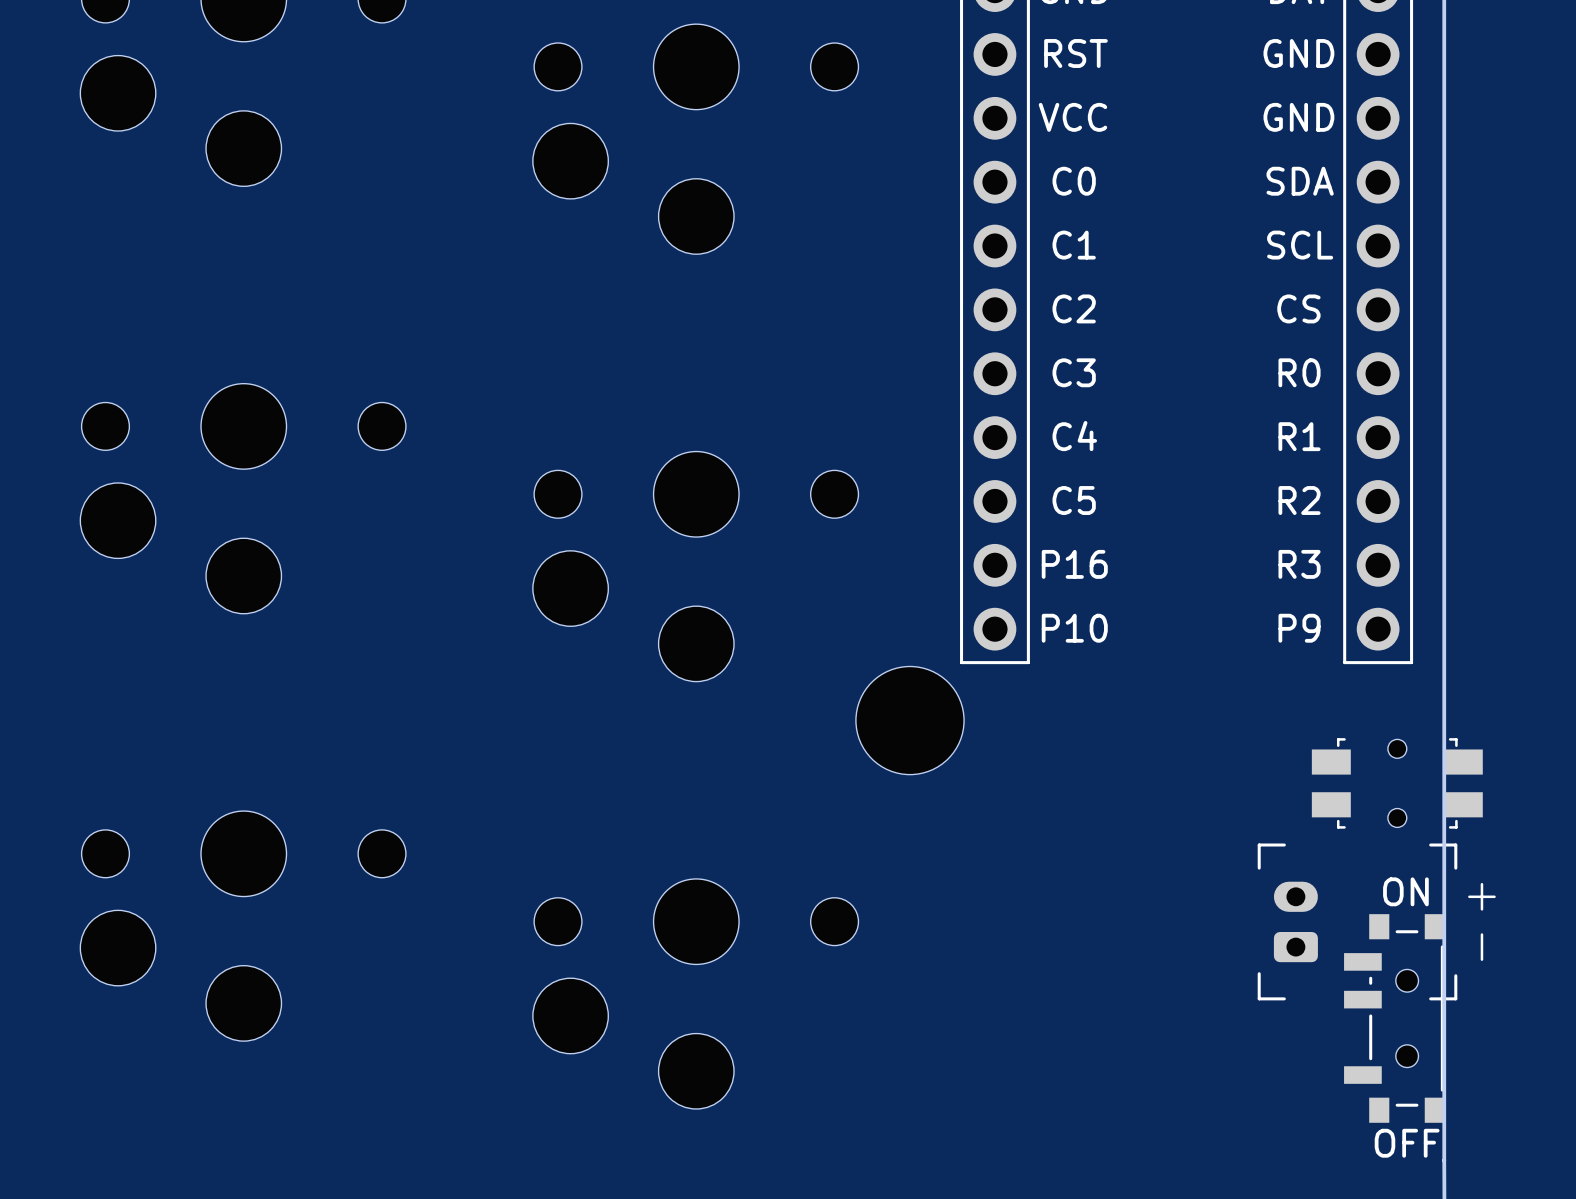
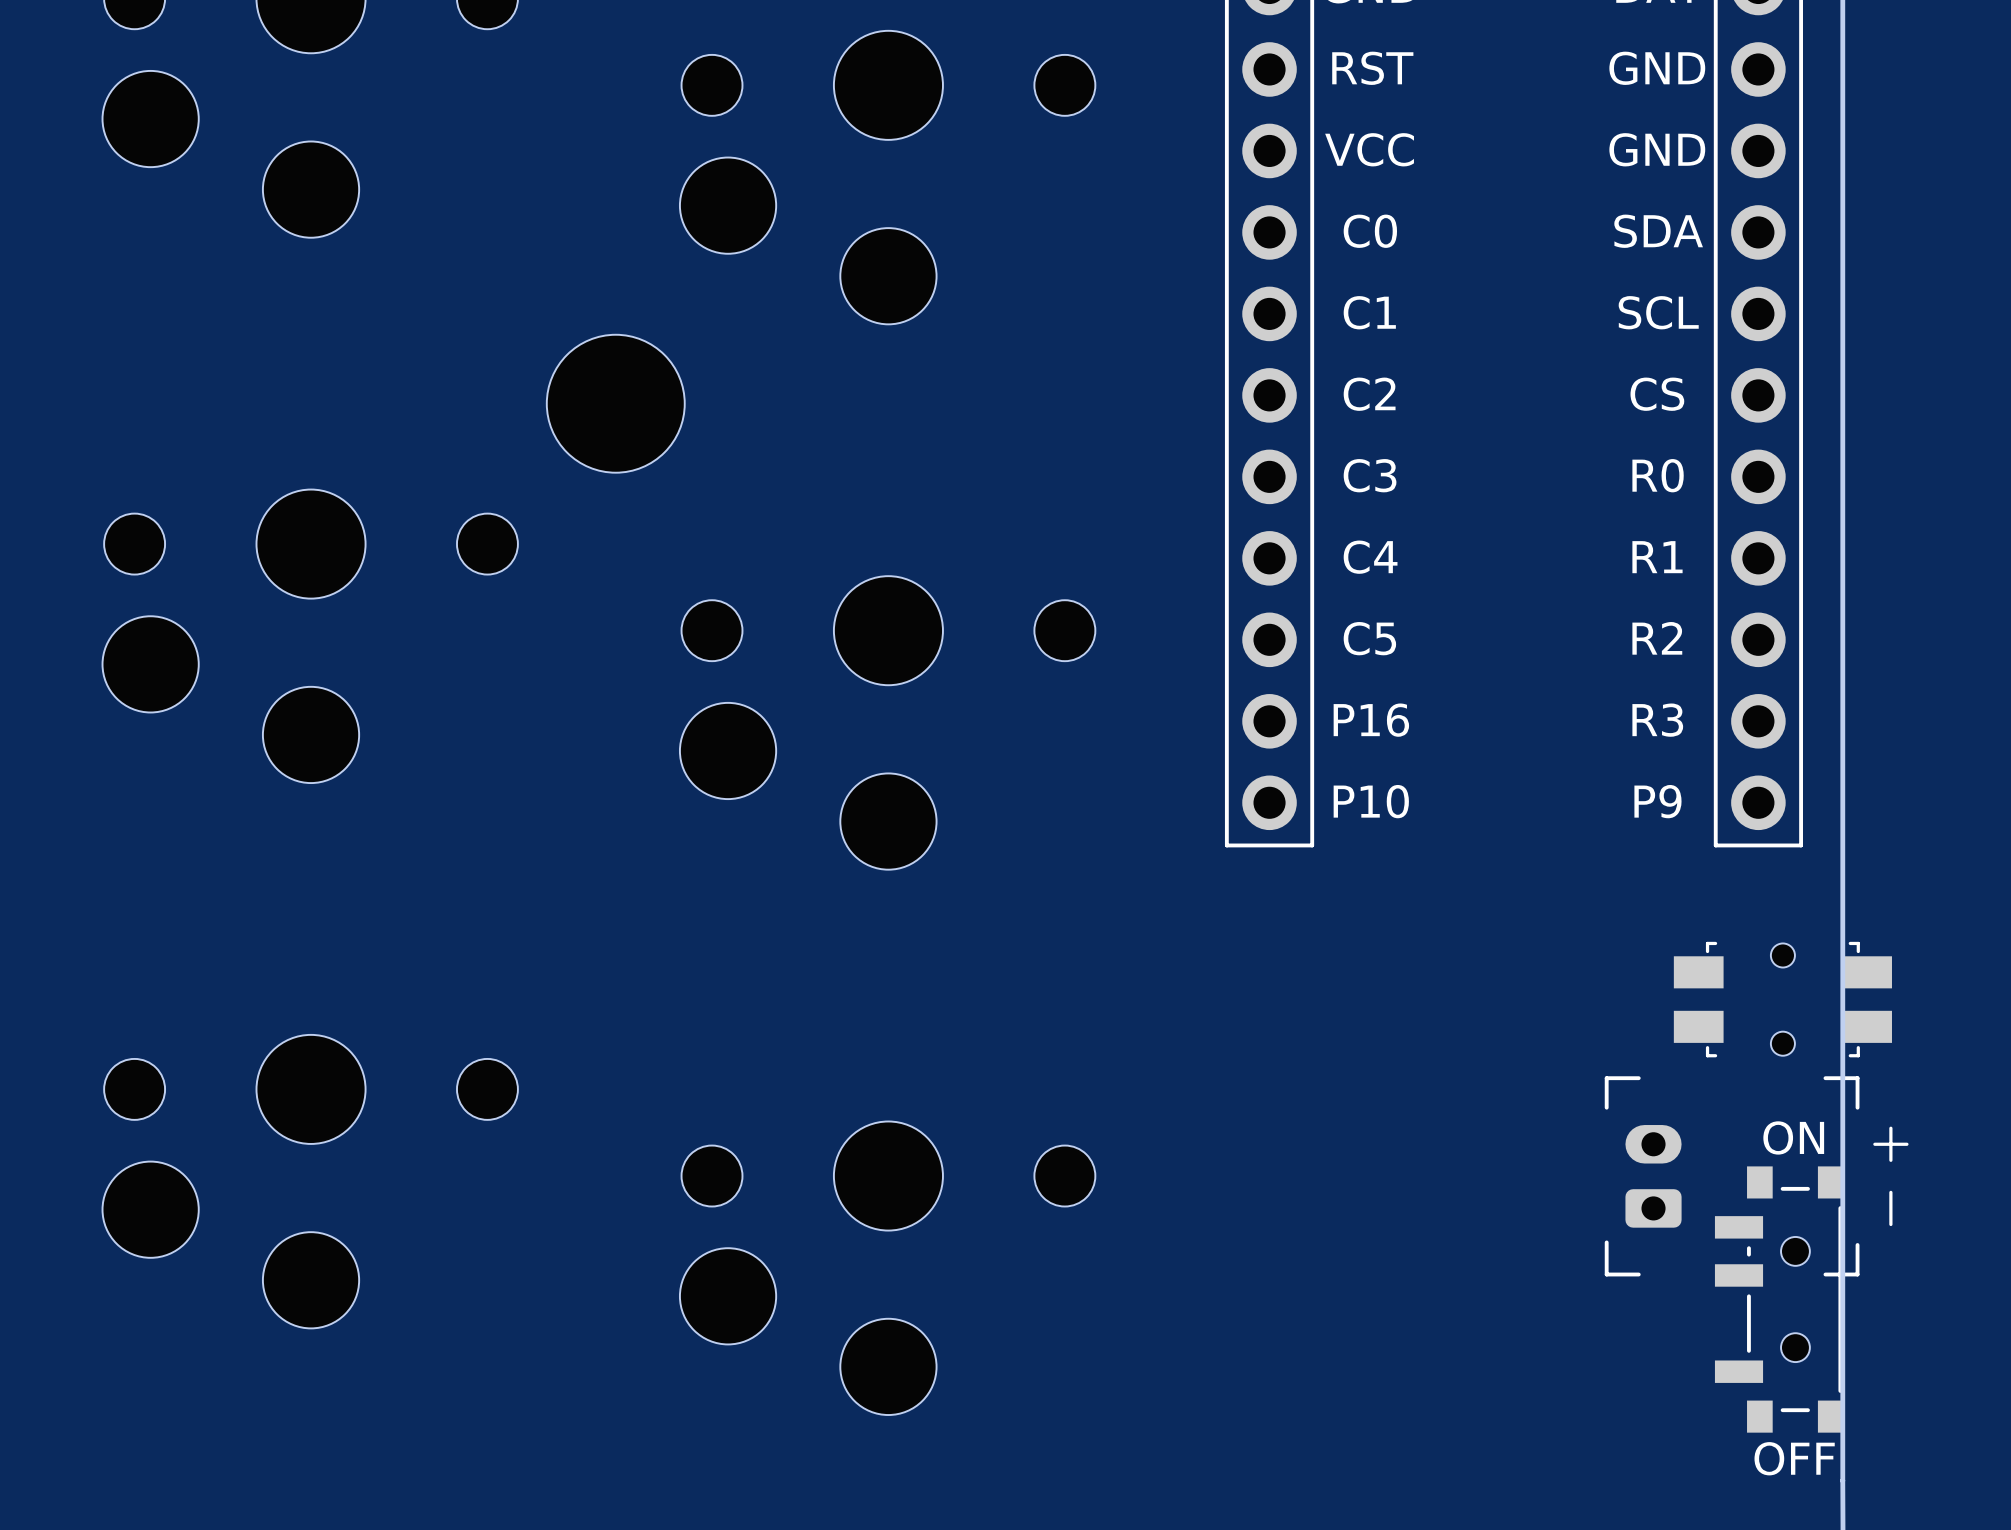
part position: (909, 720) -> (615, 403)

